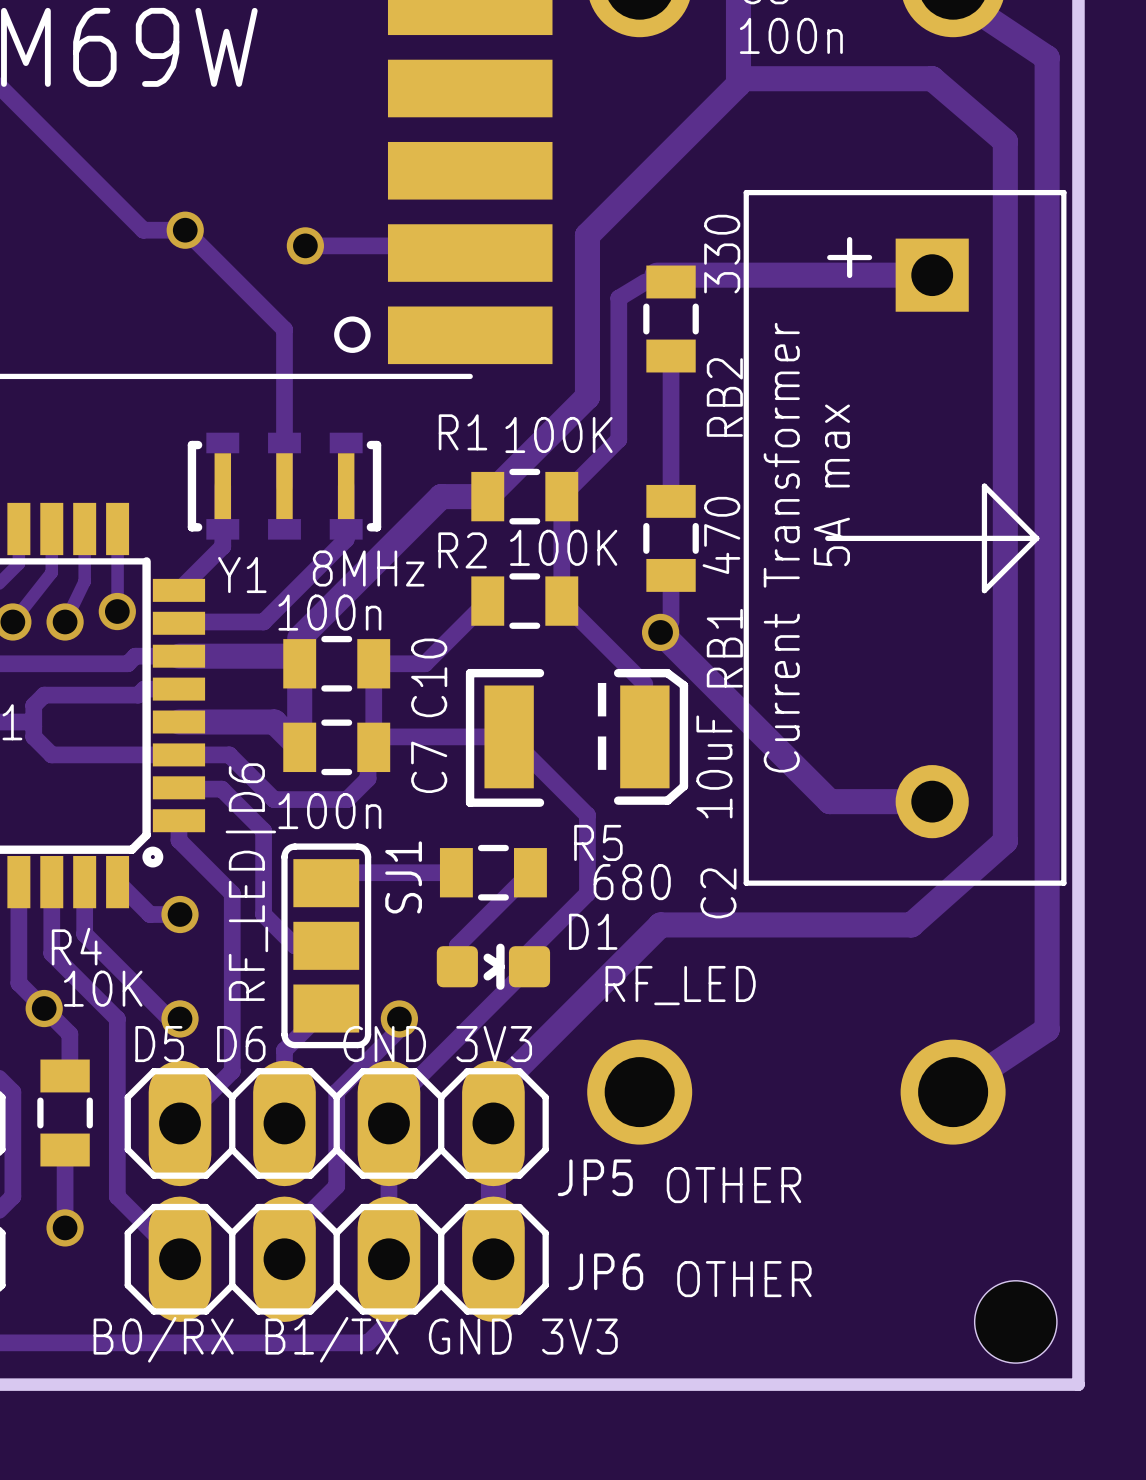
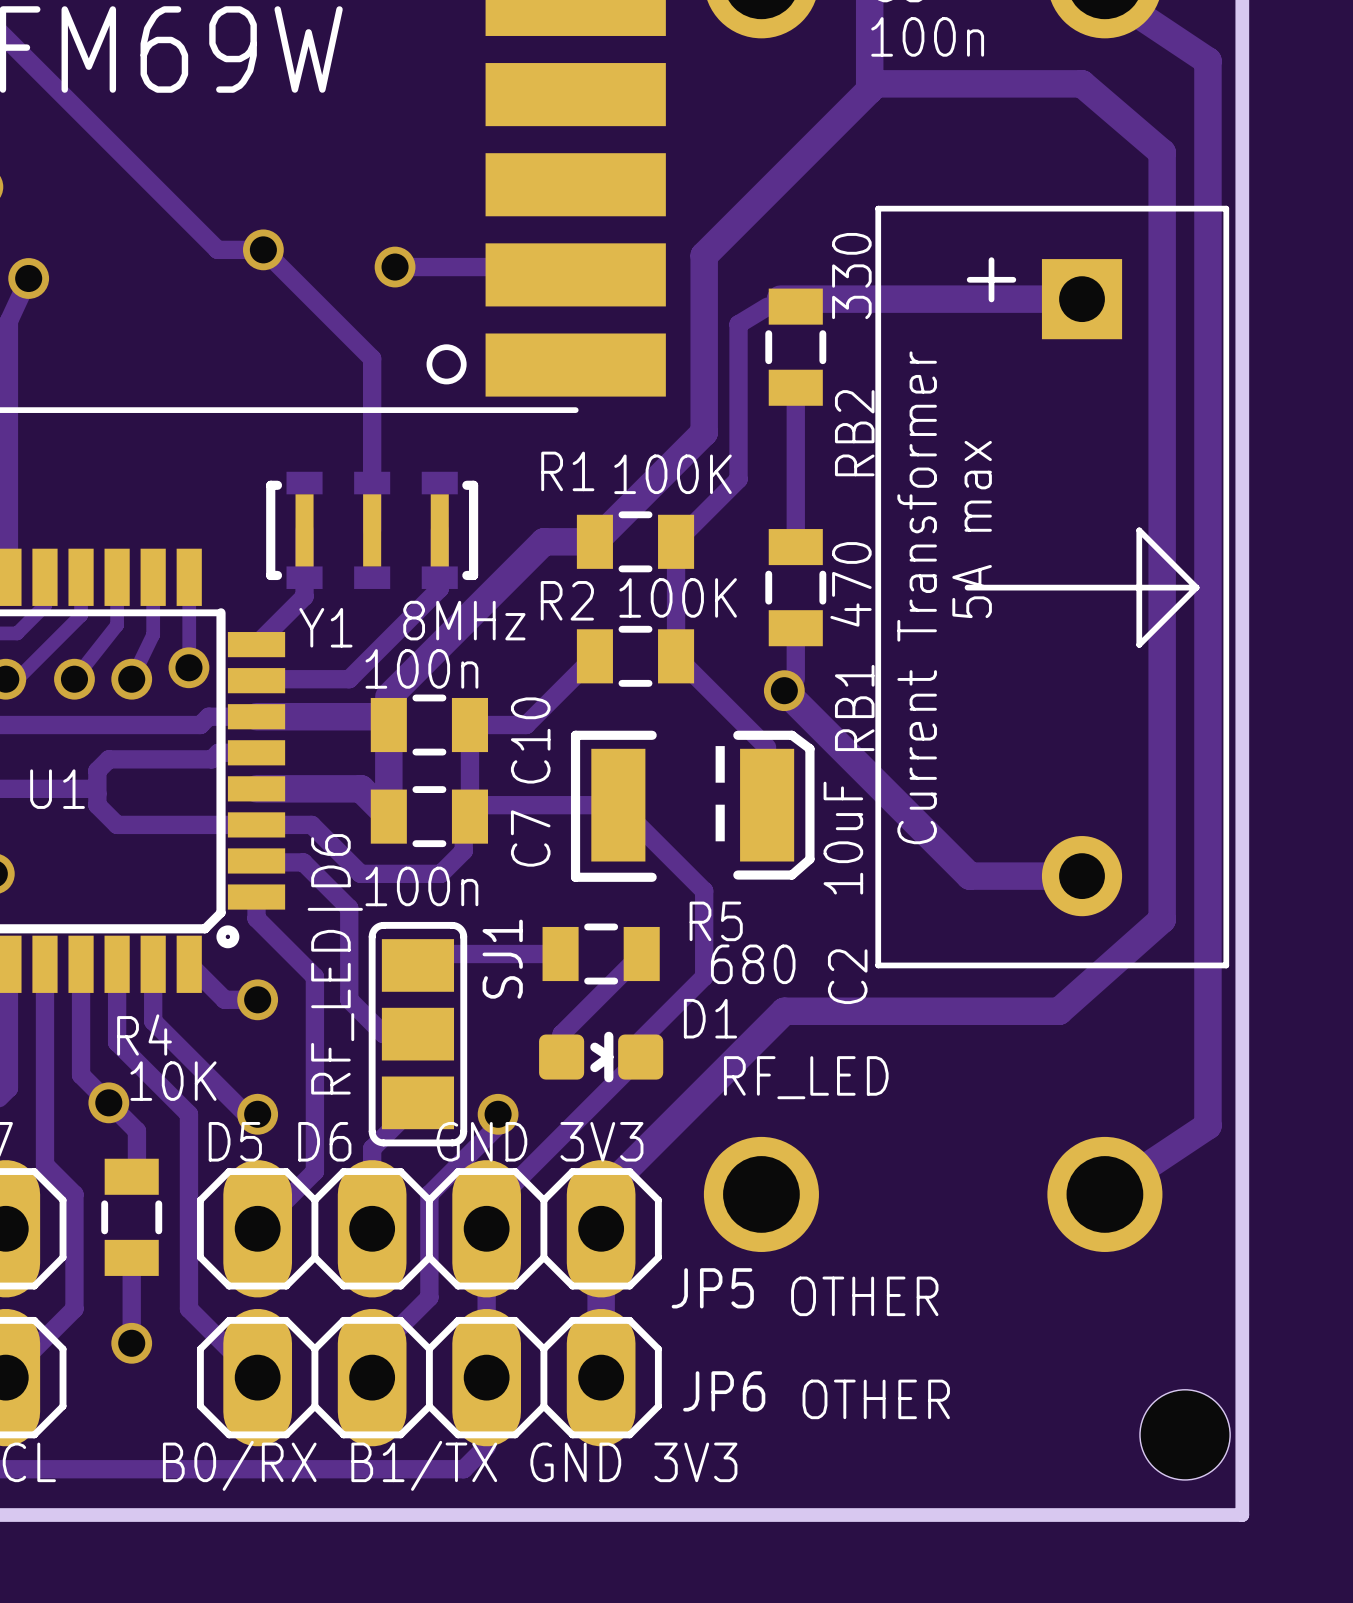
hole position: (1015, 1321) -> (1185, 1434)

